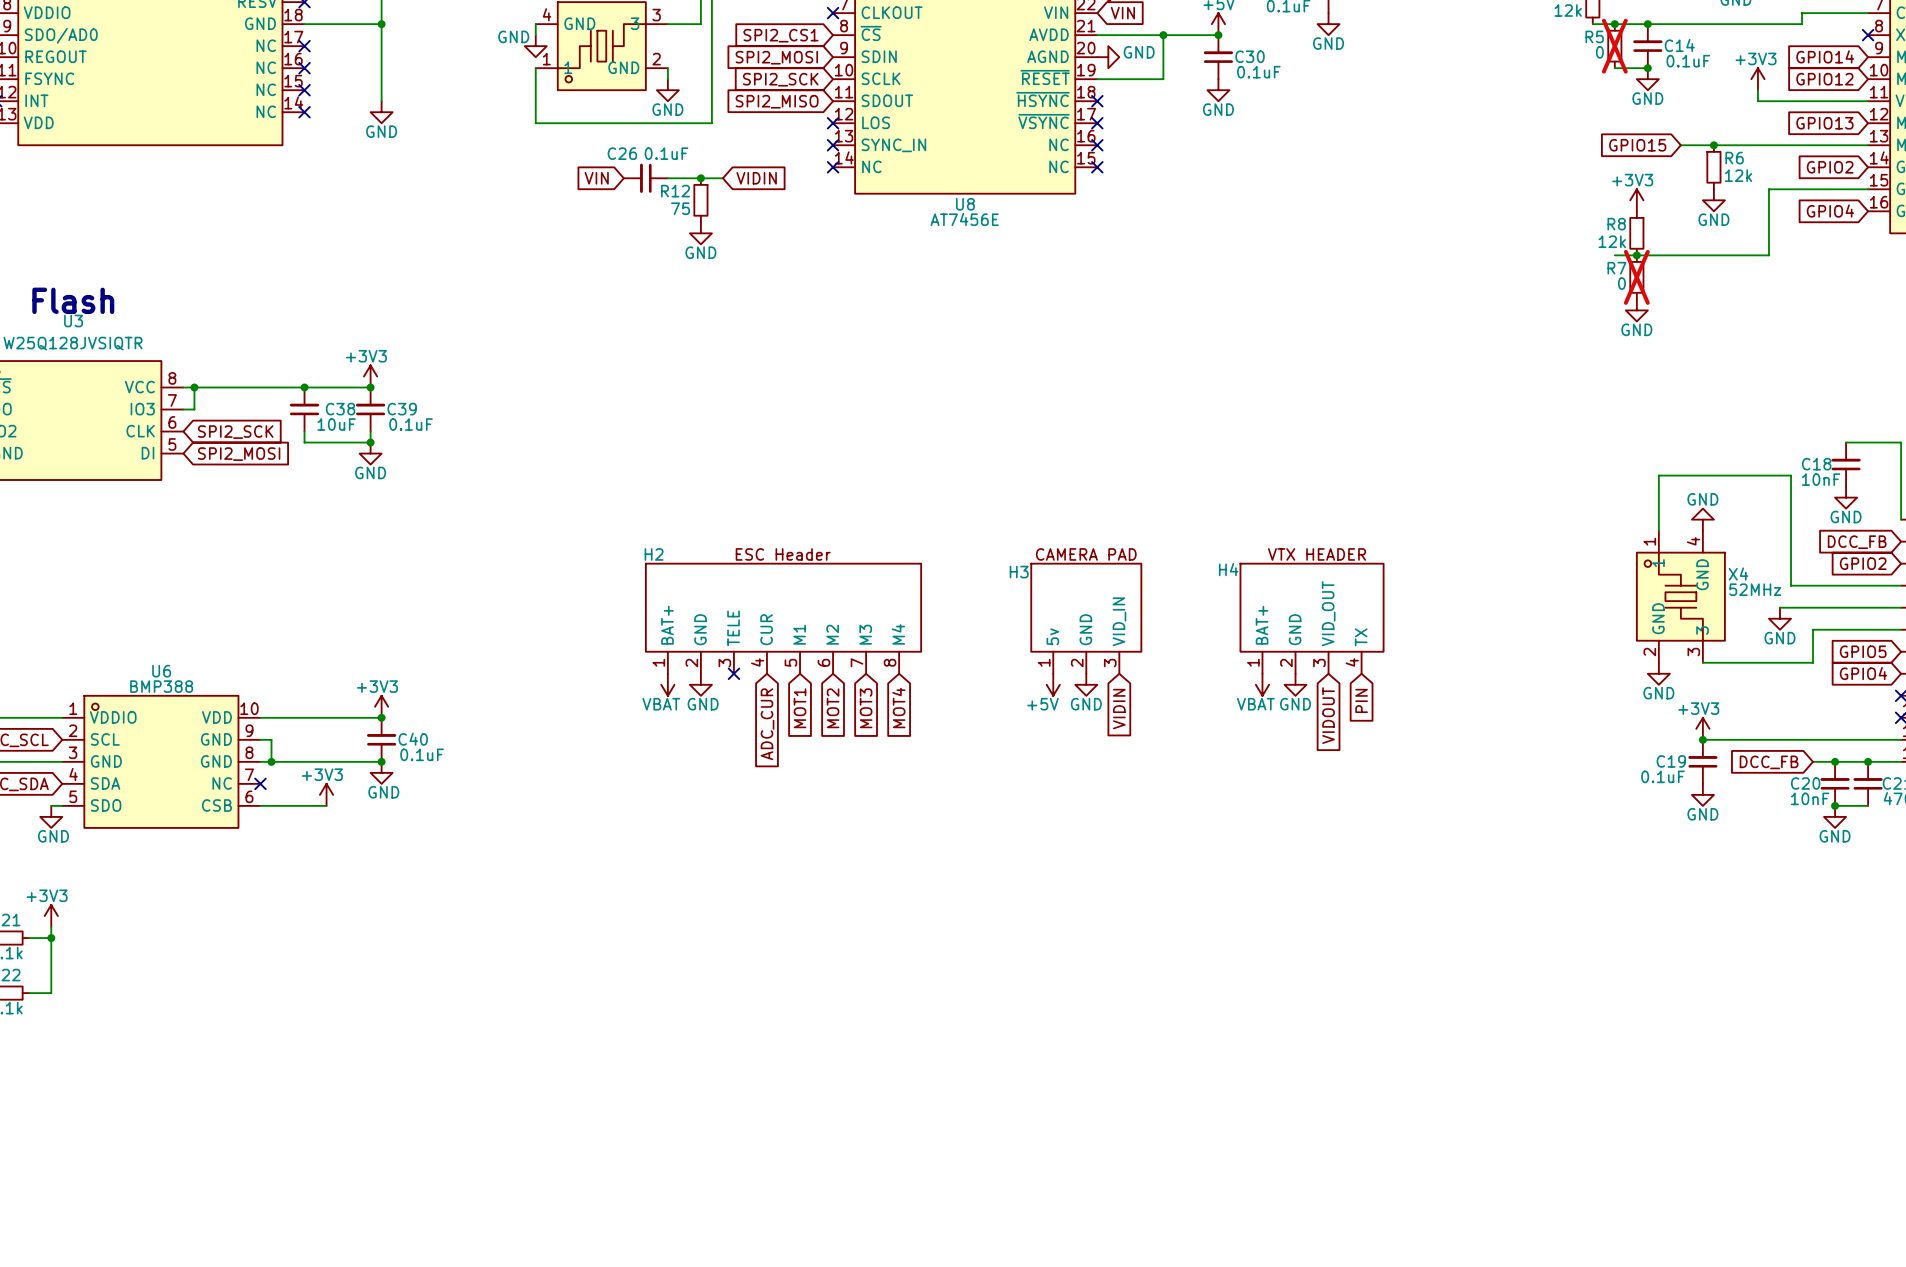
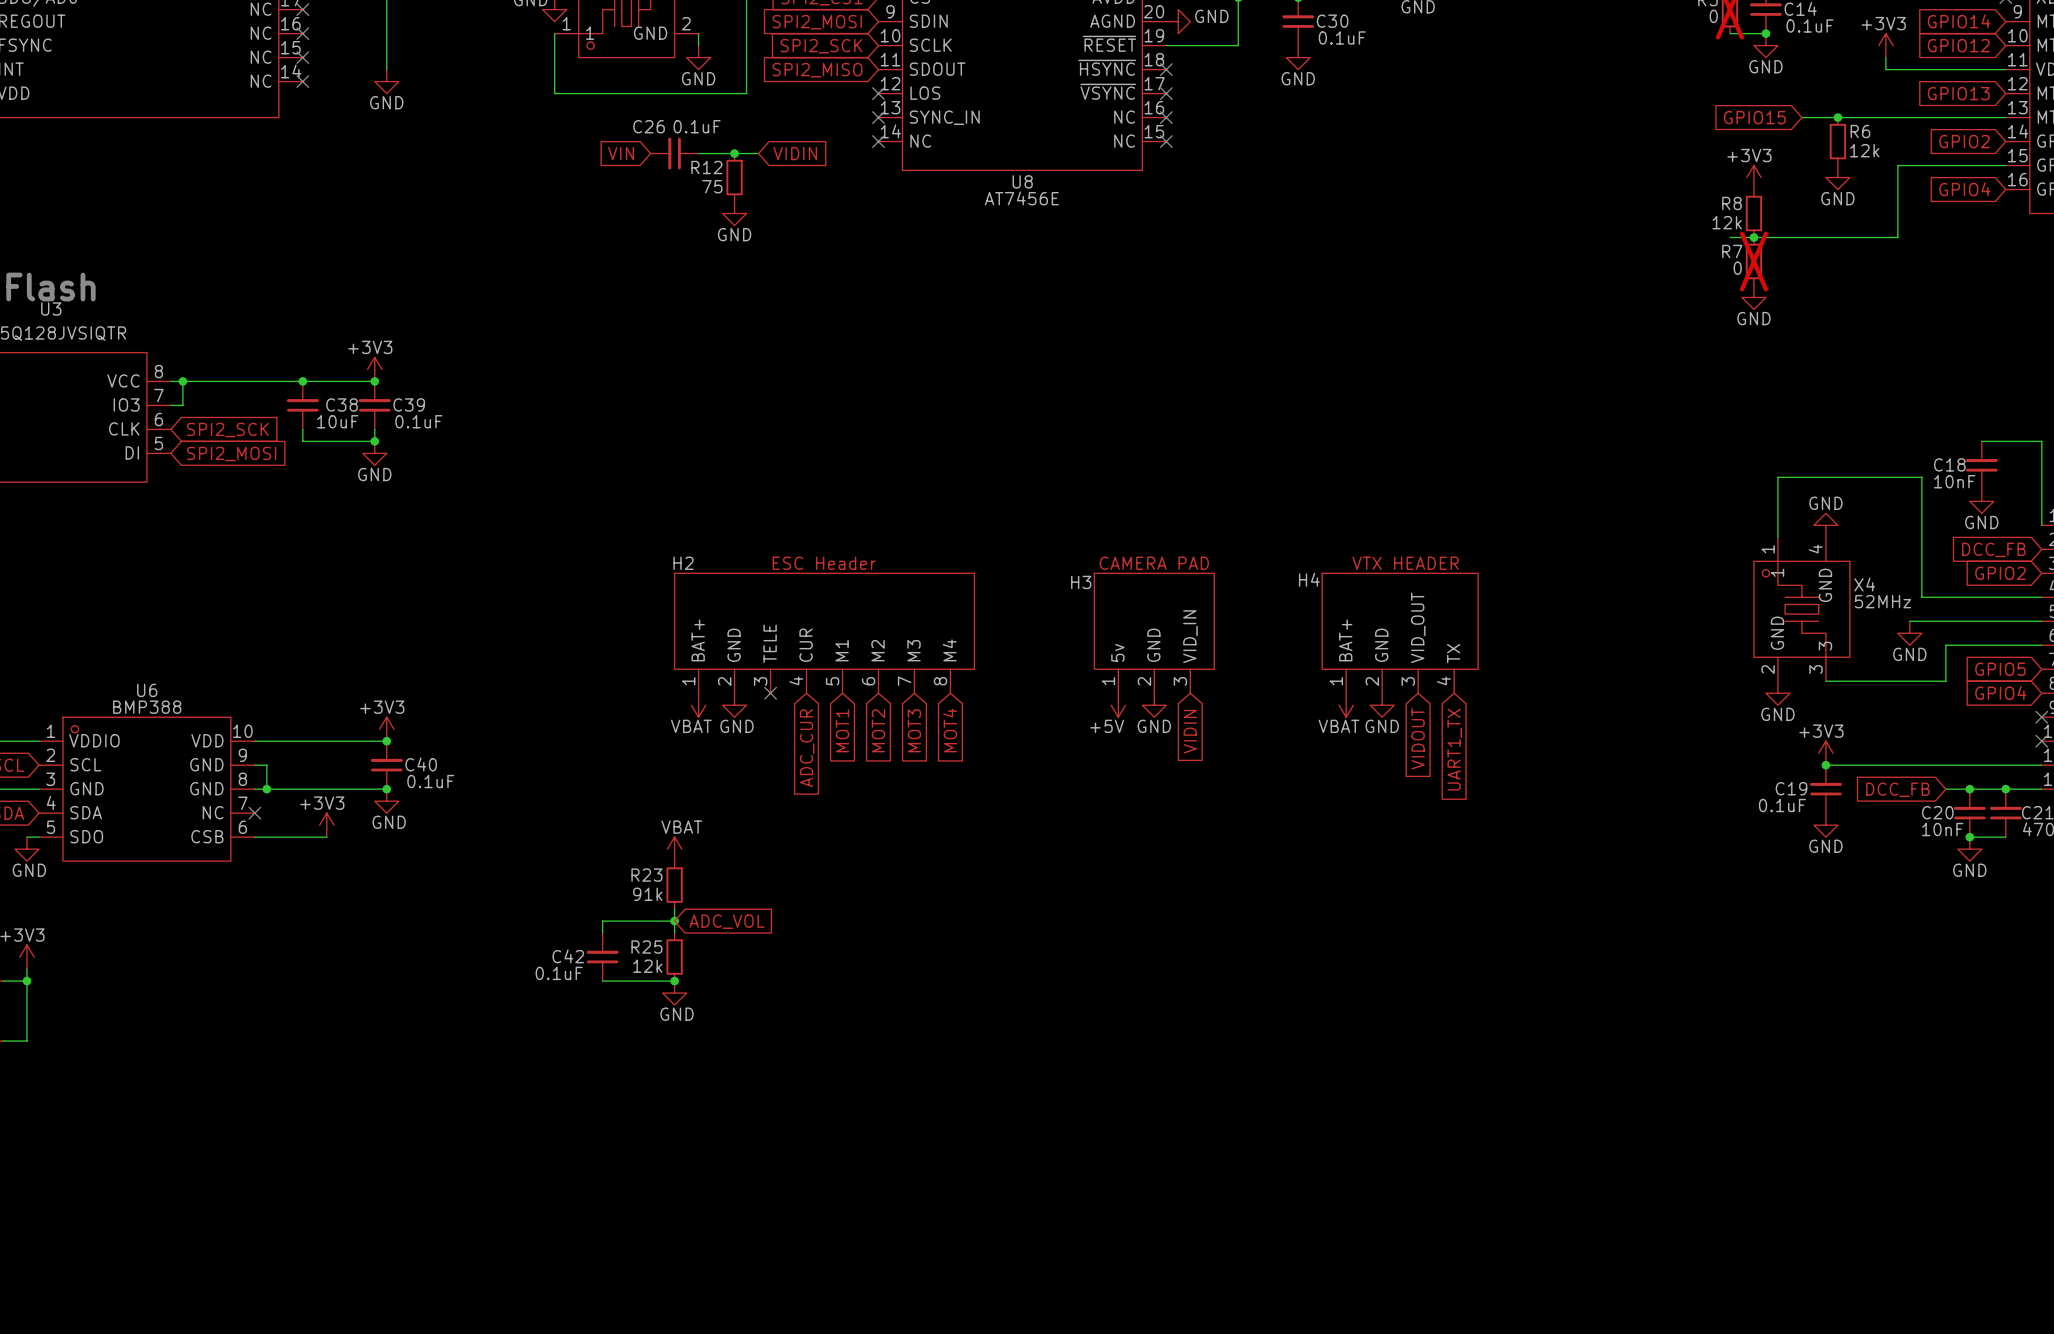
global label: PIN (1361, 700) -> UART1_TX (1454, 749)
power symbol: none -> VBAT (674, 849)
R23: none -> 91k (674, 885)
wire: none -> (674, 909) (674, 933)
wire: none -> (674, 921) (602, 921) (602, 933)
junction: none -> (674, 921)
global label: none -> ADC_VOL (727, 921)
C42: none -> 0.1uF (602, 957)
R25: none -> 12k (674, 957)
wire: none -> (602, 981) (674, 981)
junction: none -> (674, 981)
power symbol: none -> GND (674, 993)

